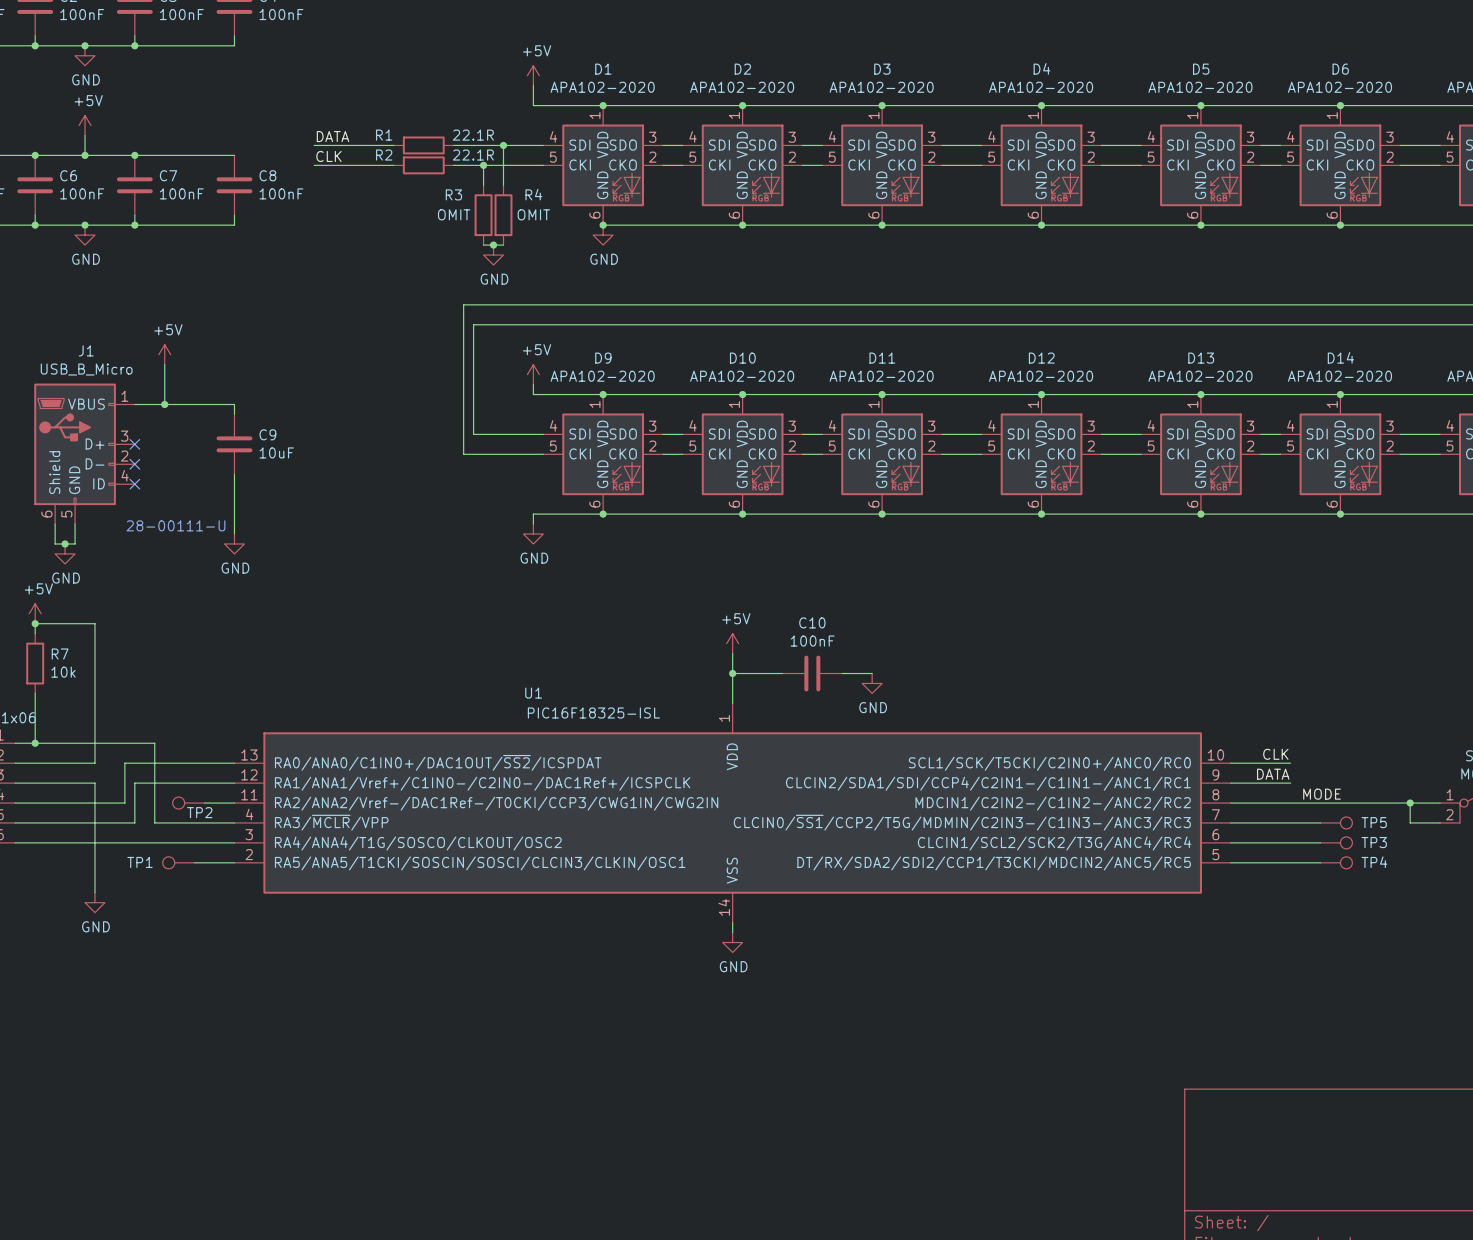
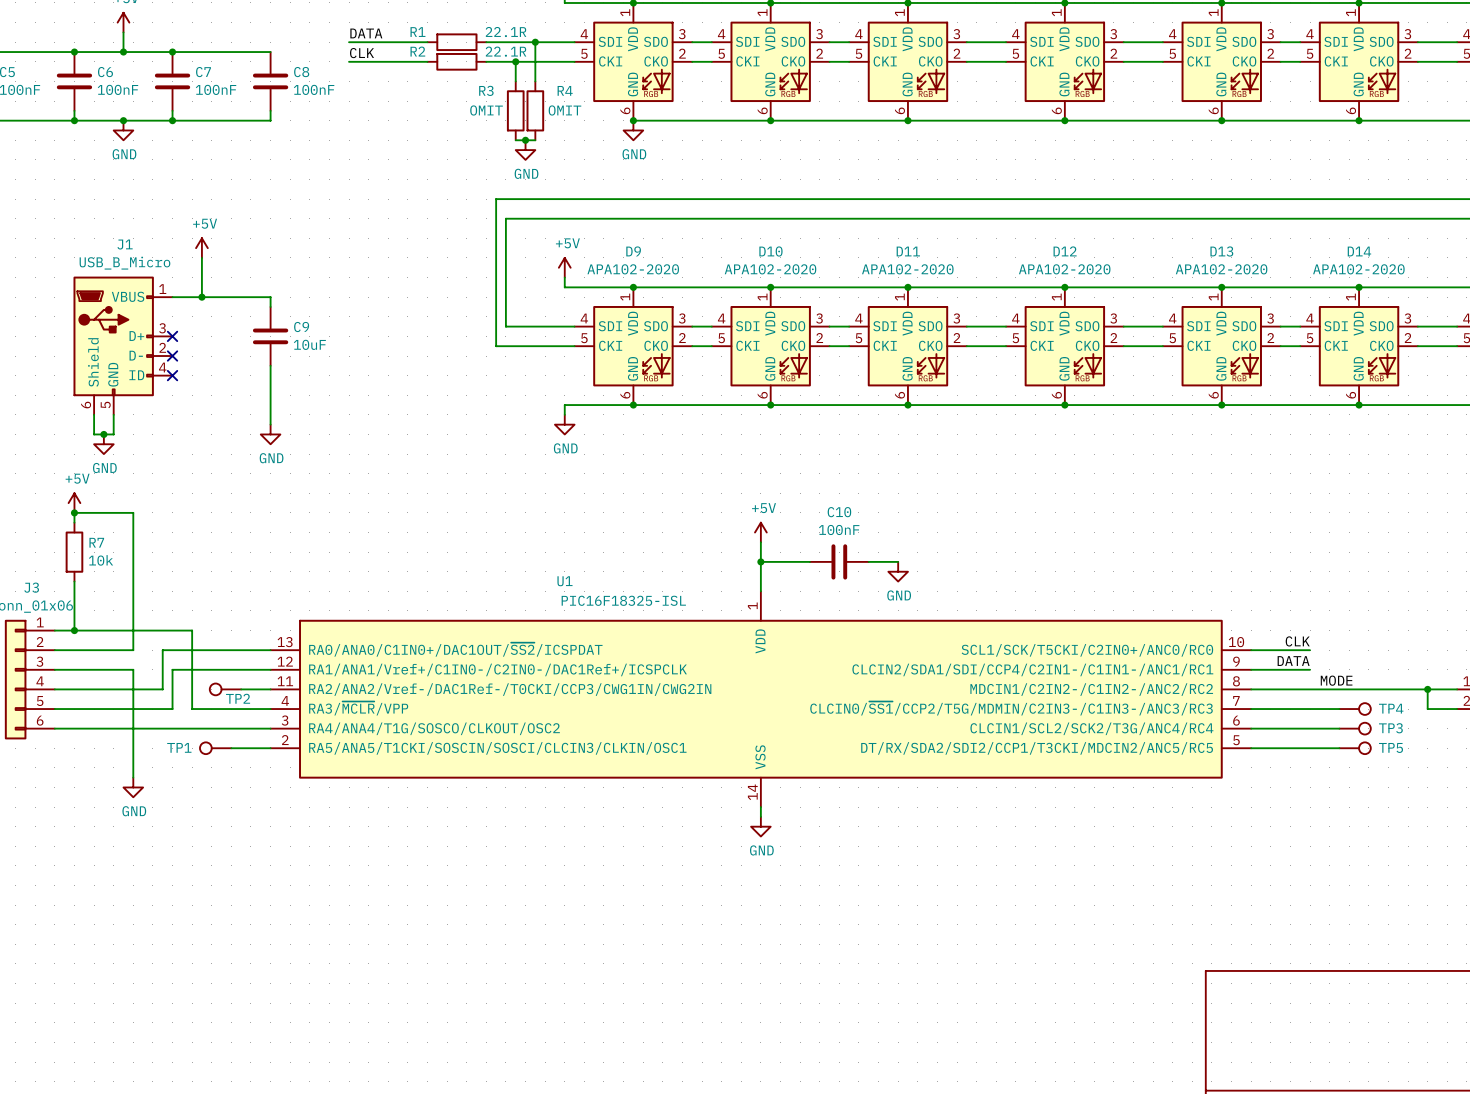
text: 28-00111-U (175, 525) -> none
TP5 name: TP5 (1374, 822) -> TP4 (1391, 708)
TP4 name: TP4 (1374, 862) -> TP5 (1391, 747)

